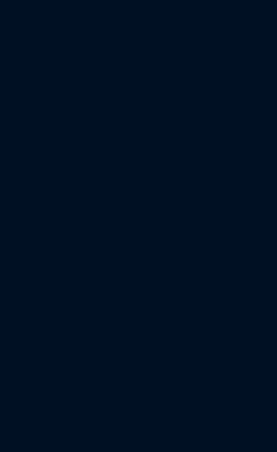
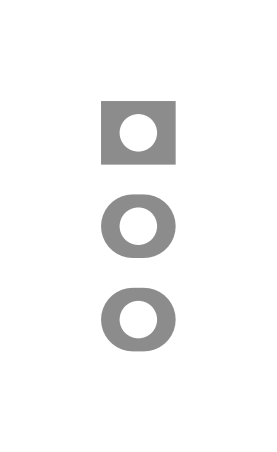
part: none -> (138, 226)

